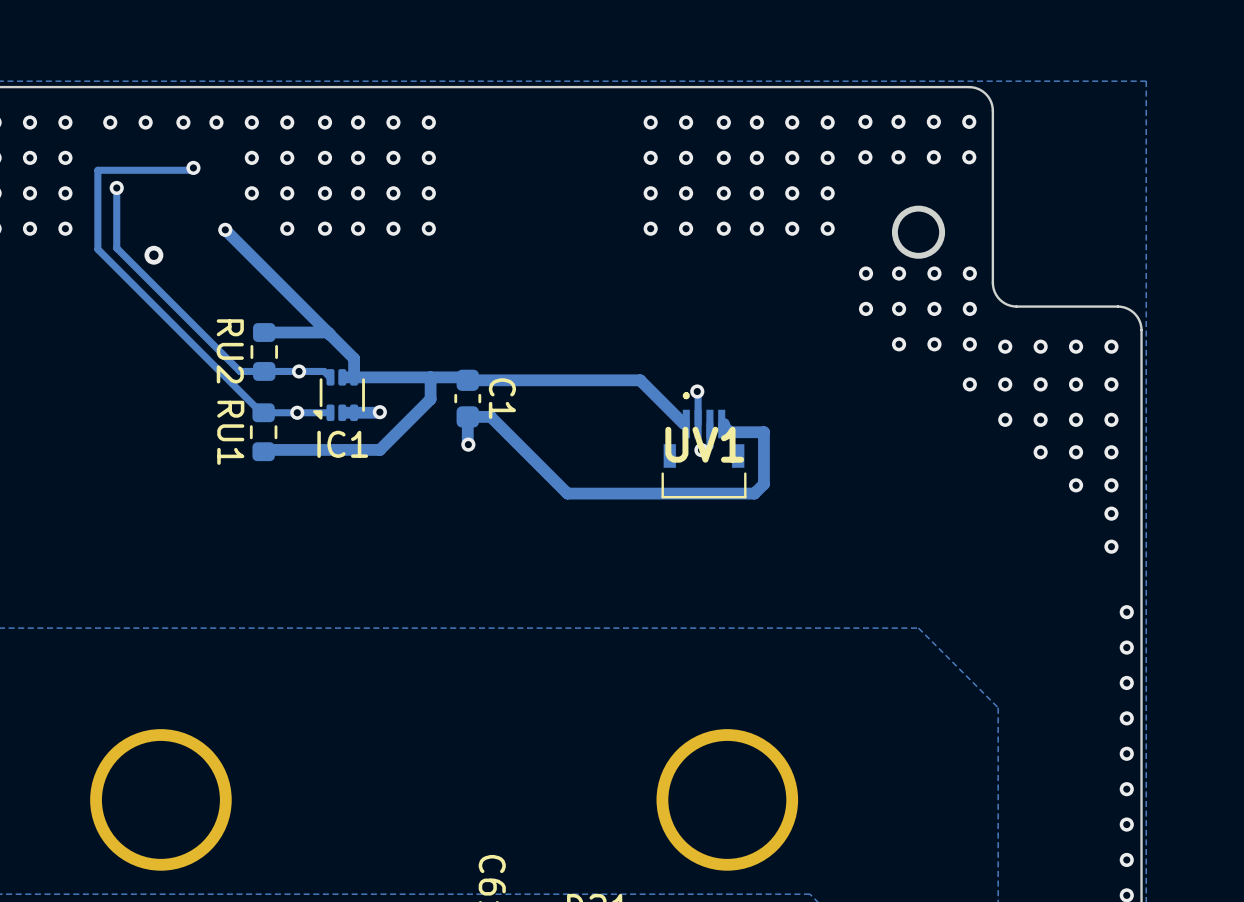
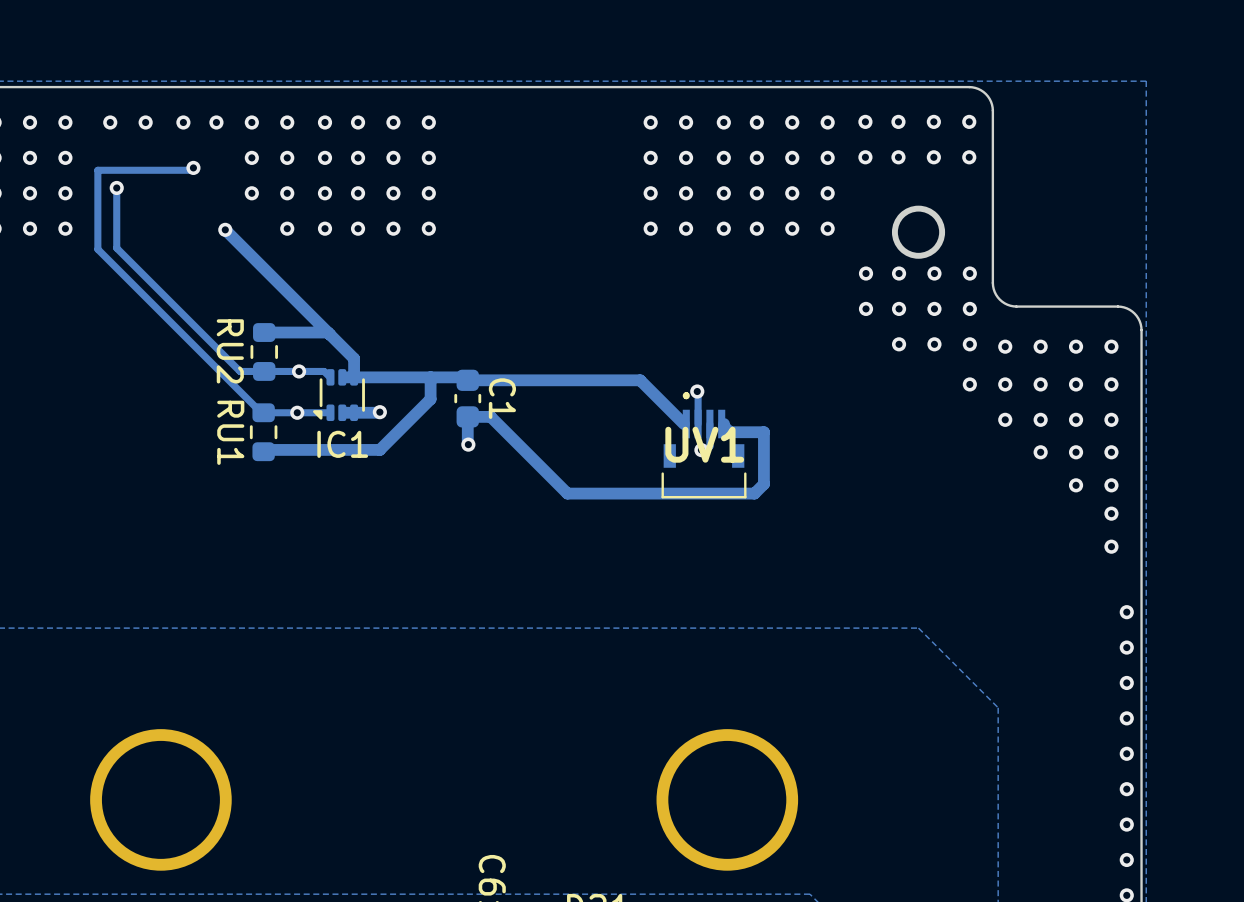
via: (153, 255) -> none

